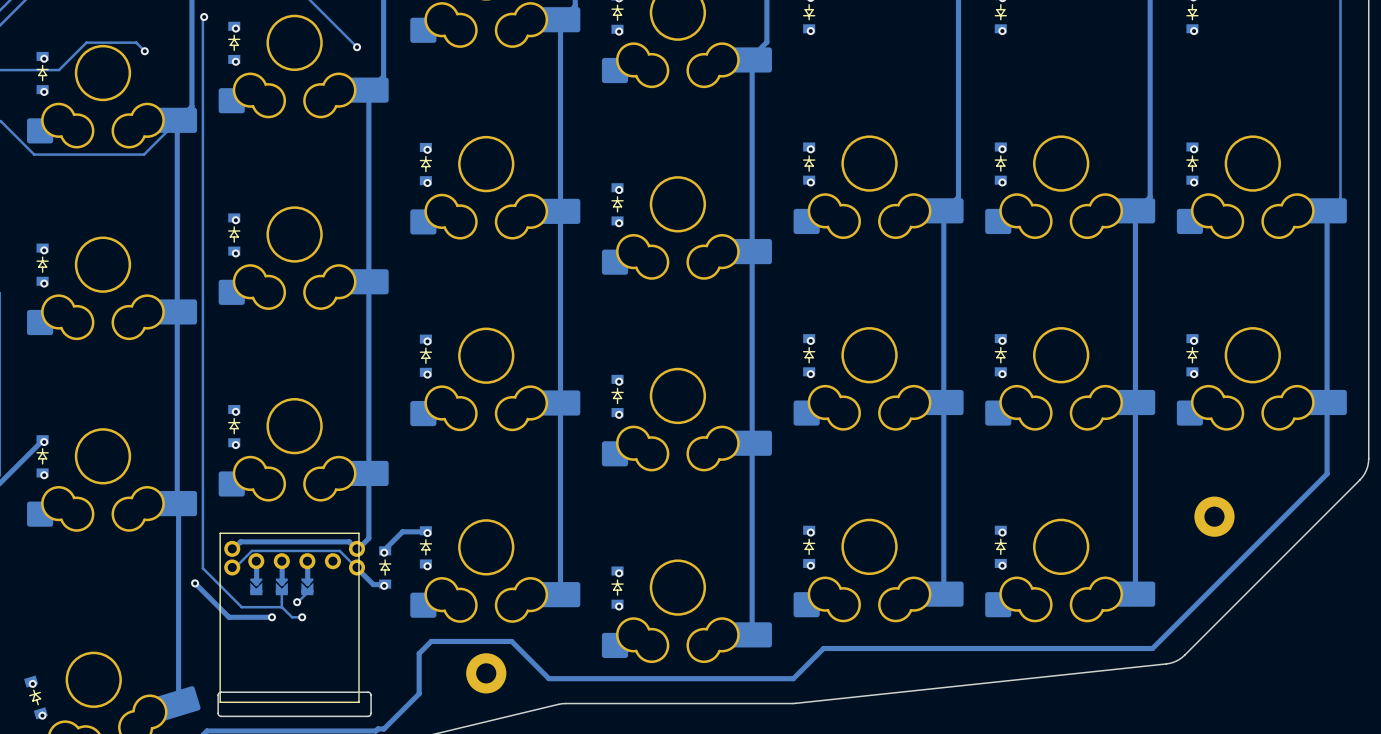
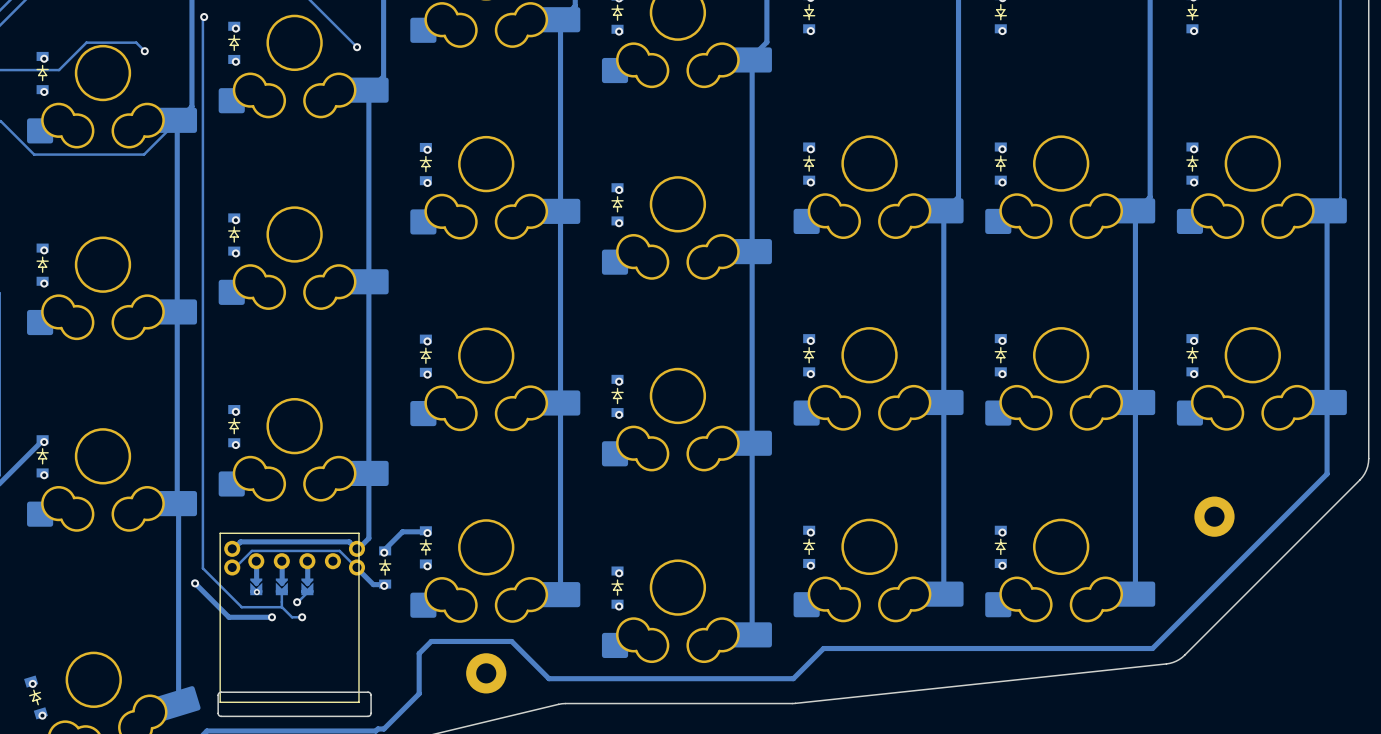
via: none -> (256, 592)

